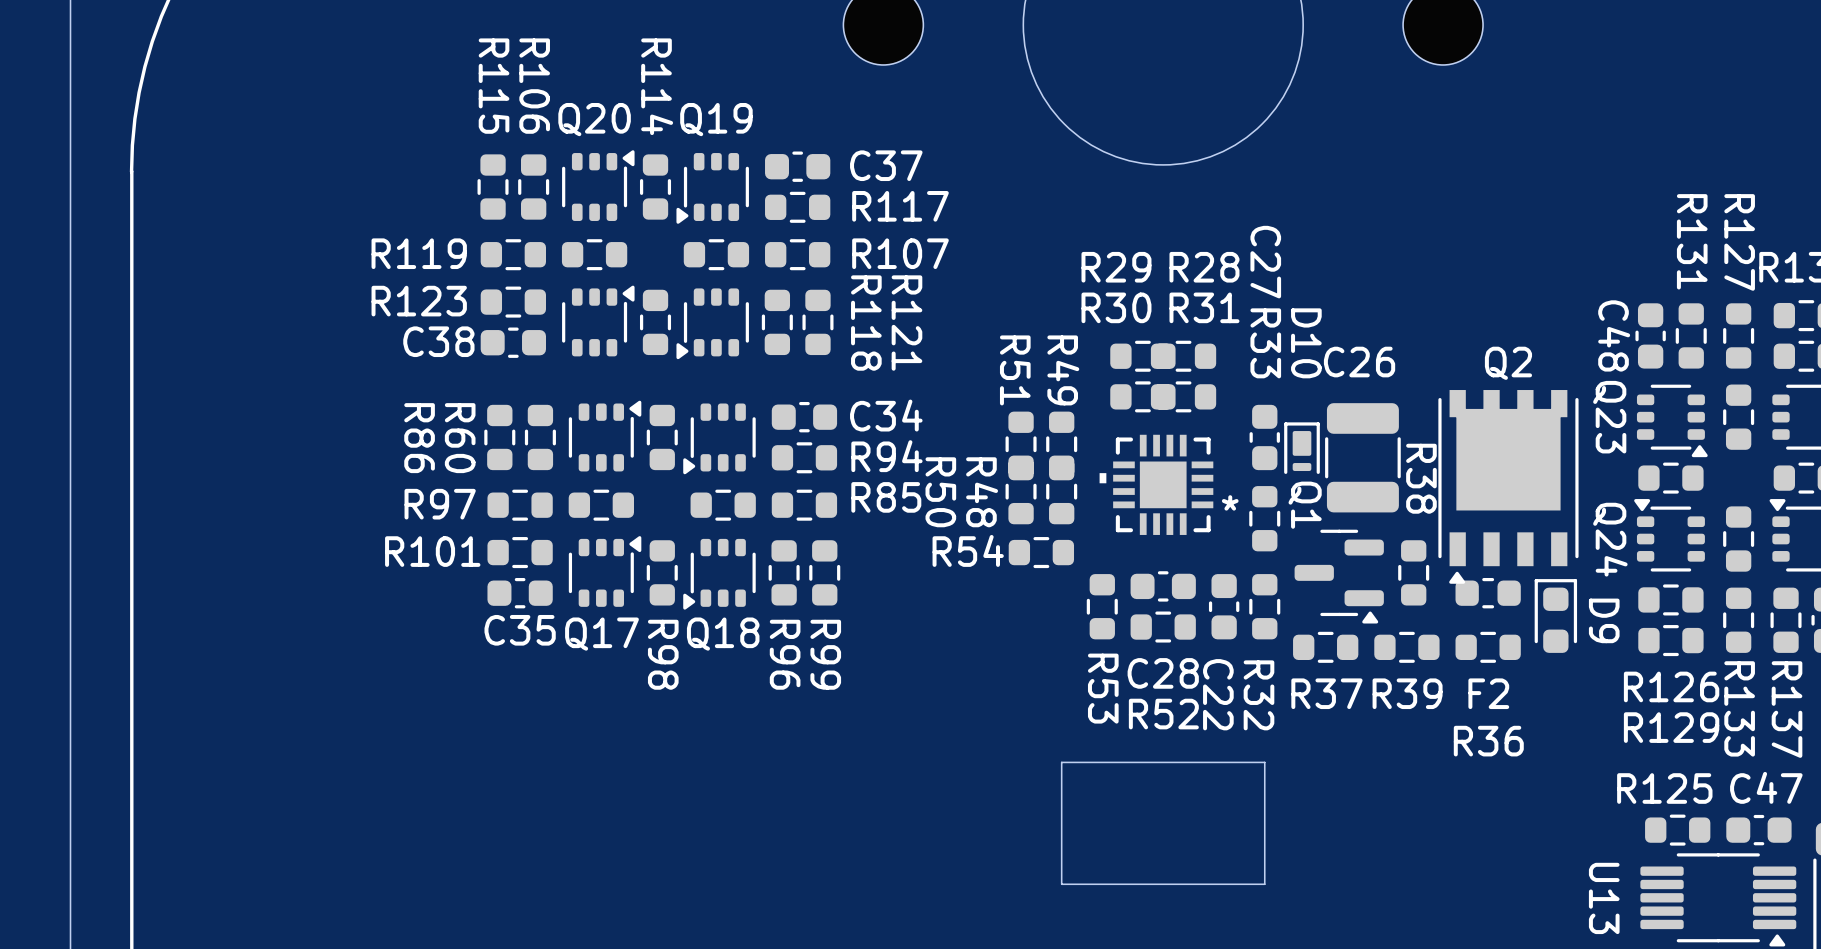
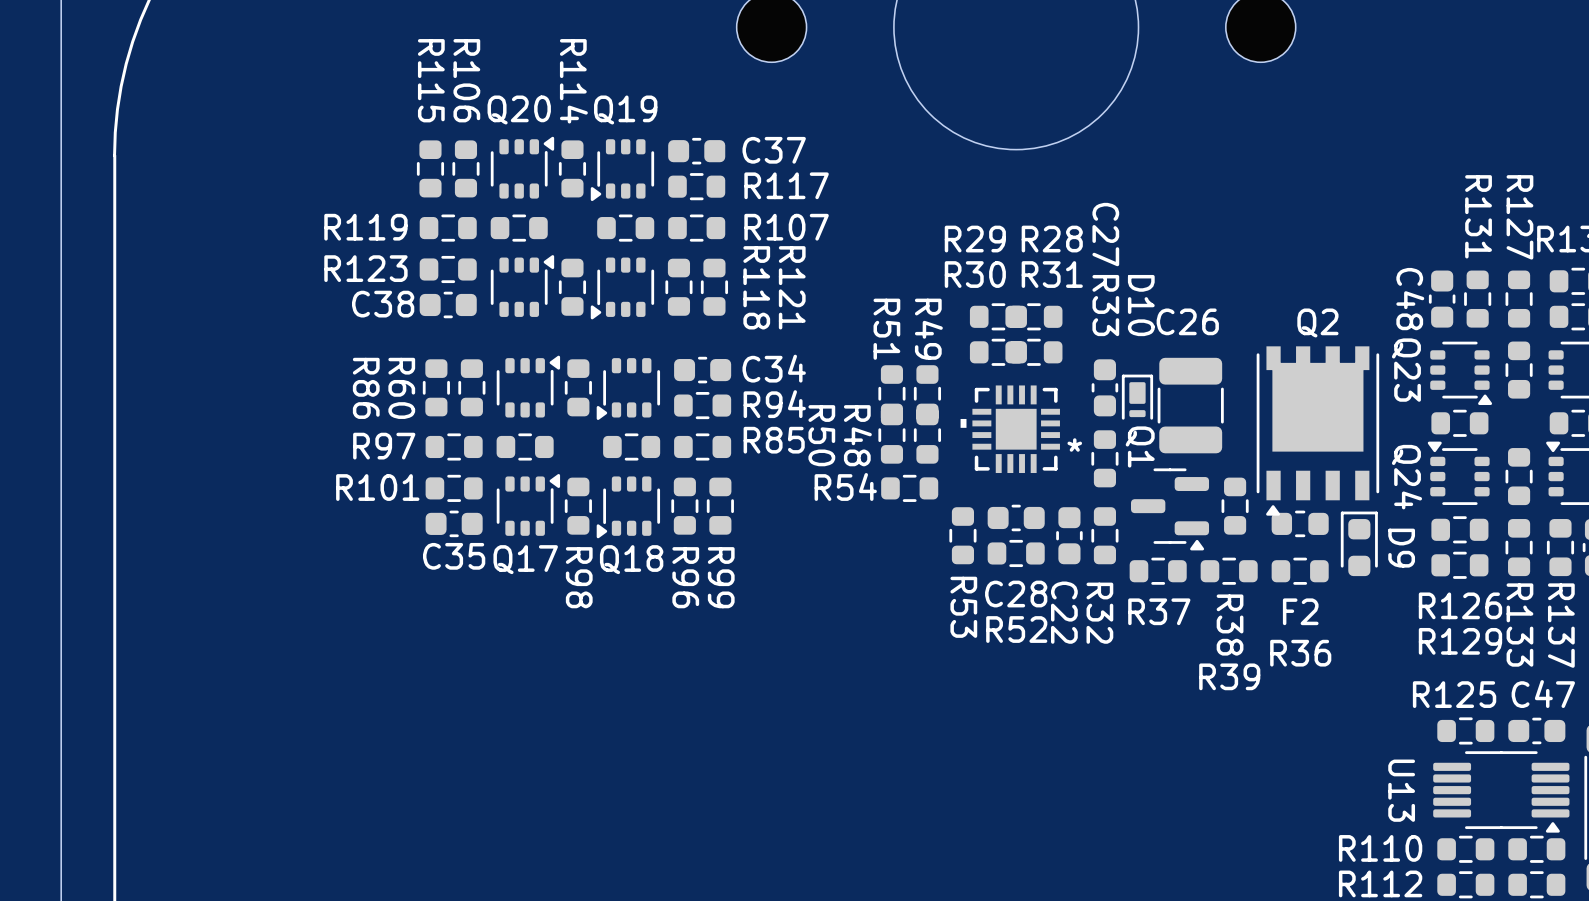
R38 name position: R38 (1421, 478) -> R38 (1230, 625)
R39 name position: R39 (1407, 693) -> R39 (1229, 676)
board edge: (1264, 762) (1061, 762) (1061, 884) (1264, 884) (1264, 762) -> none

